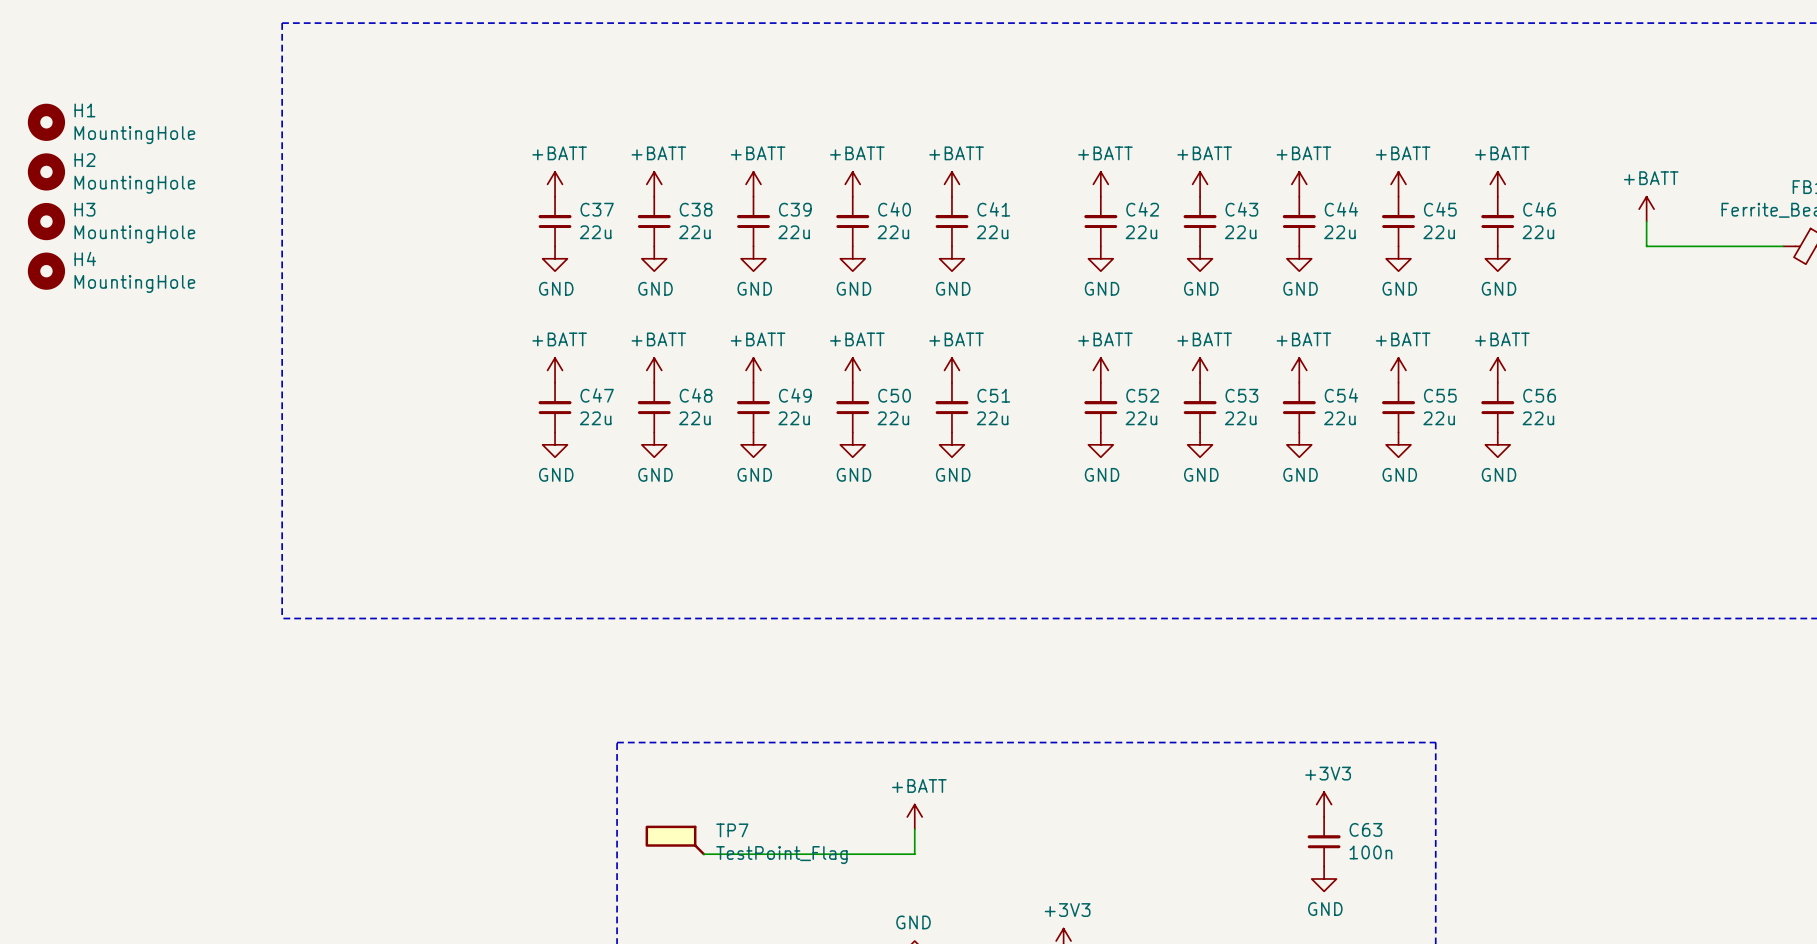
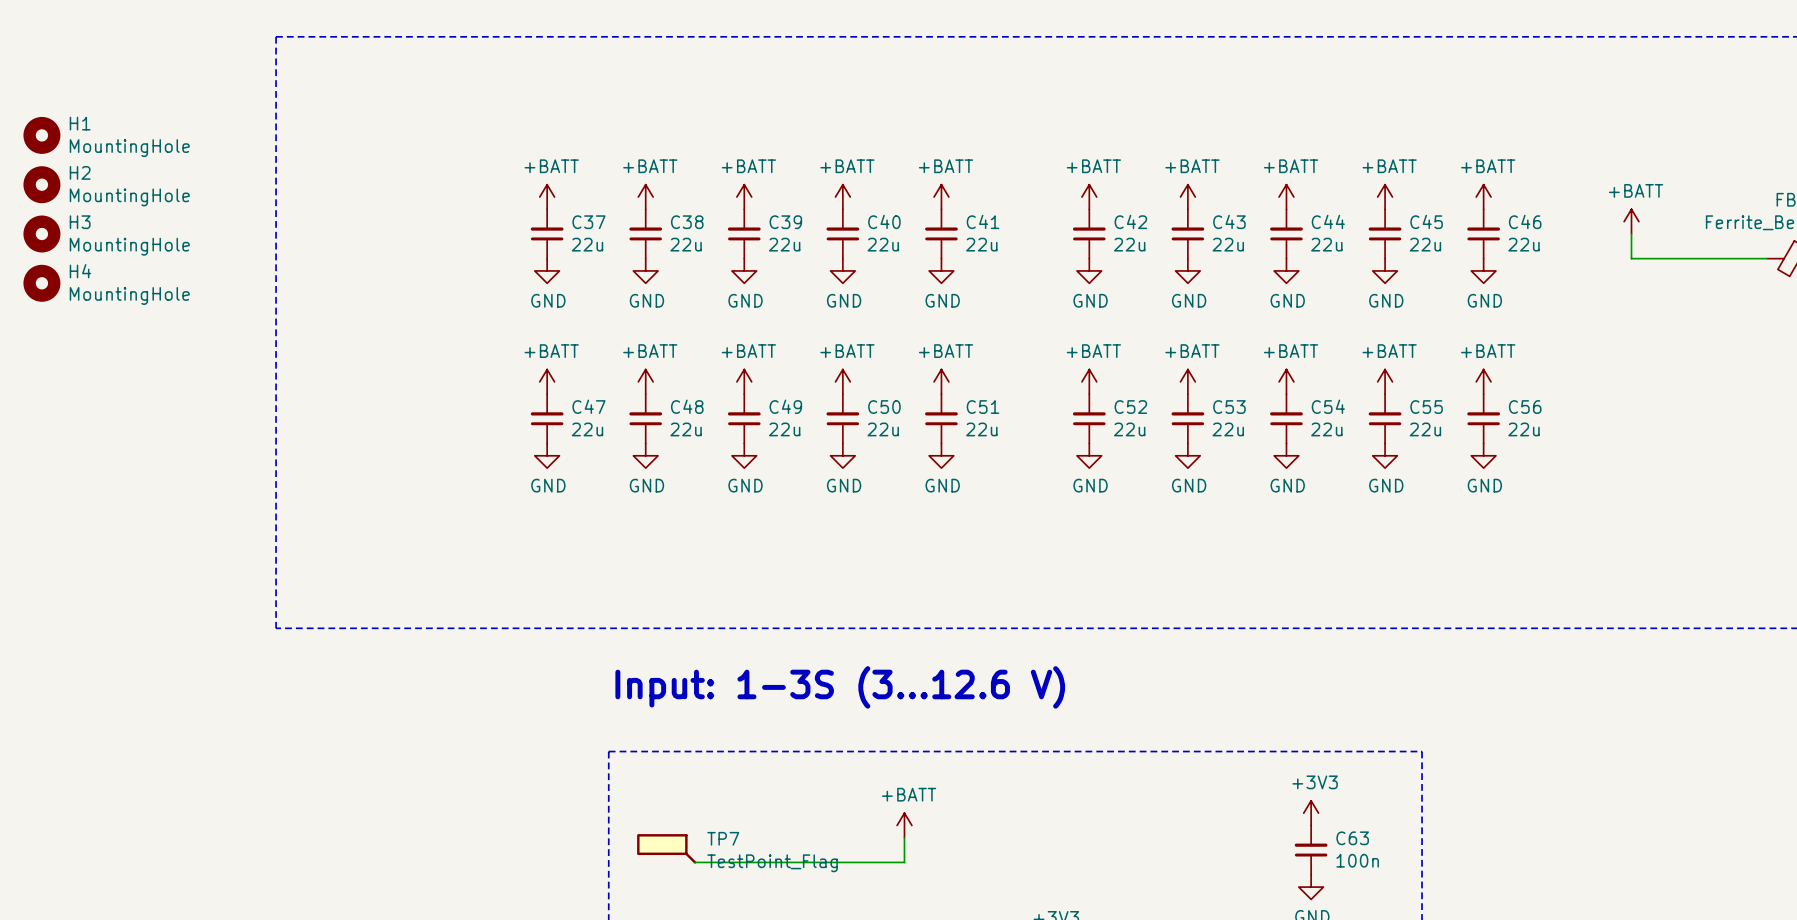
text: none -> Input: 1-3S (3...12.6 V) (840, 687)

